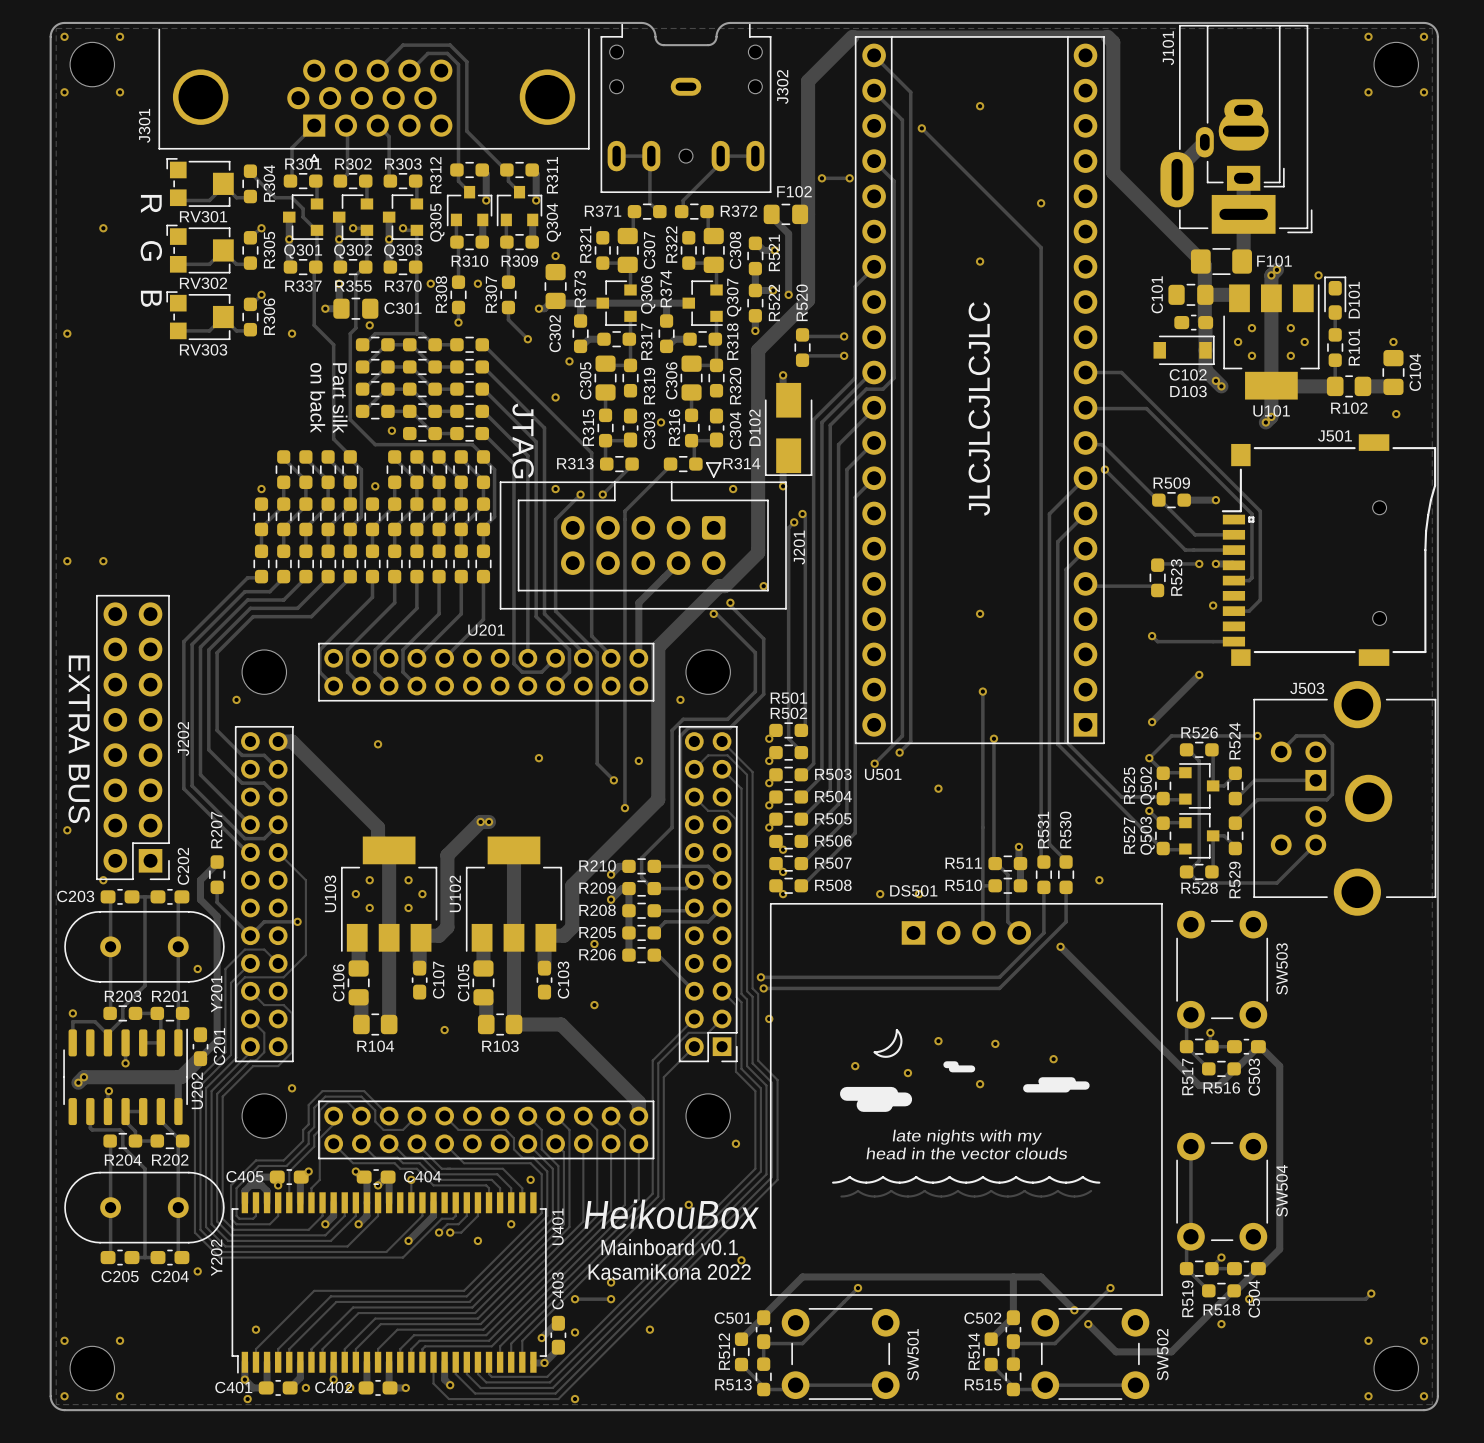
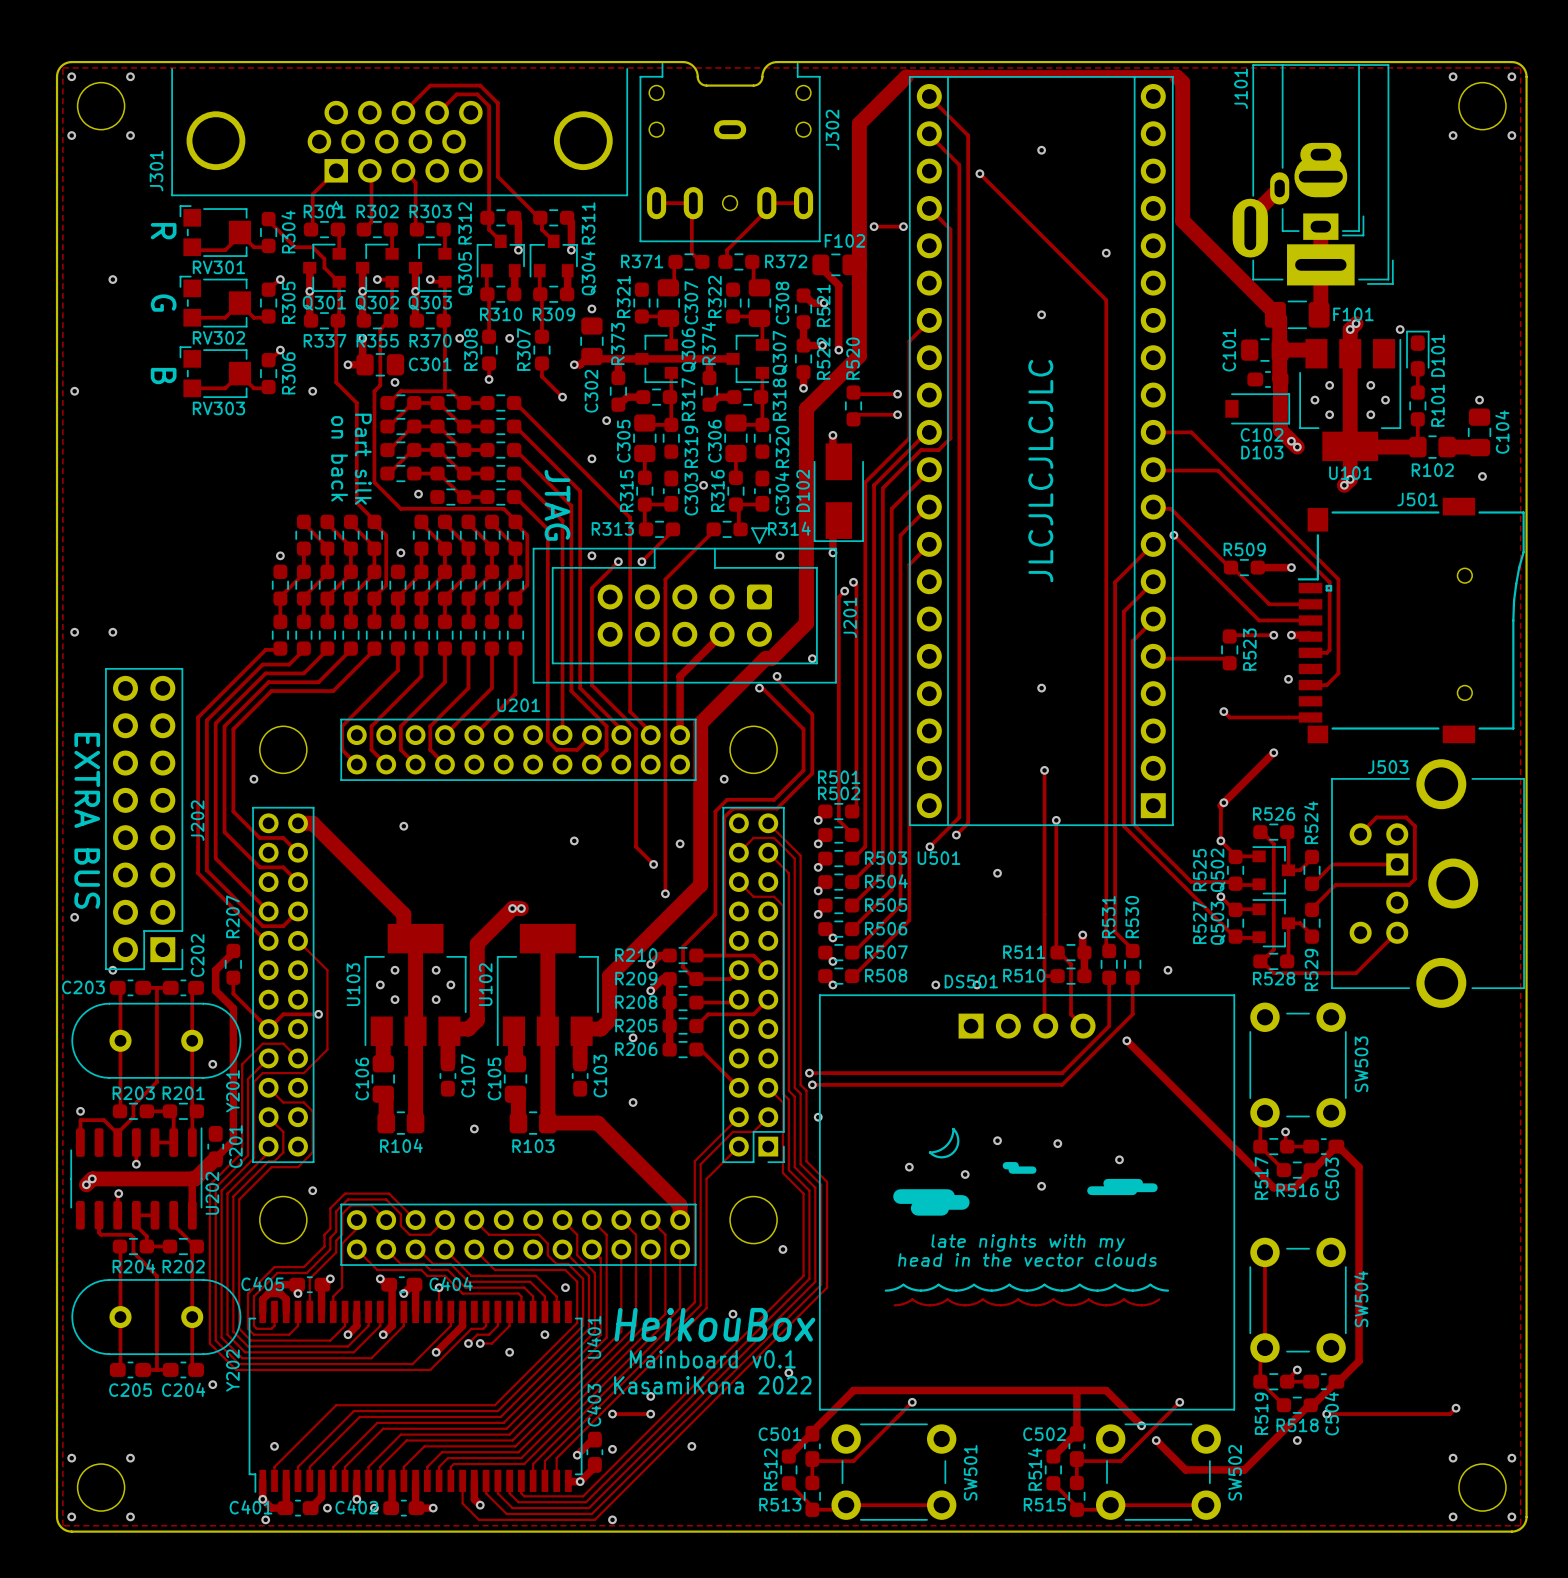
track: (1257, 735) (1171, 735) (1149, 758) -> (1223, 802) (1220, 805) (1220, 840)
via: (1257, 735) -> none

